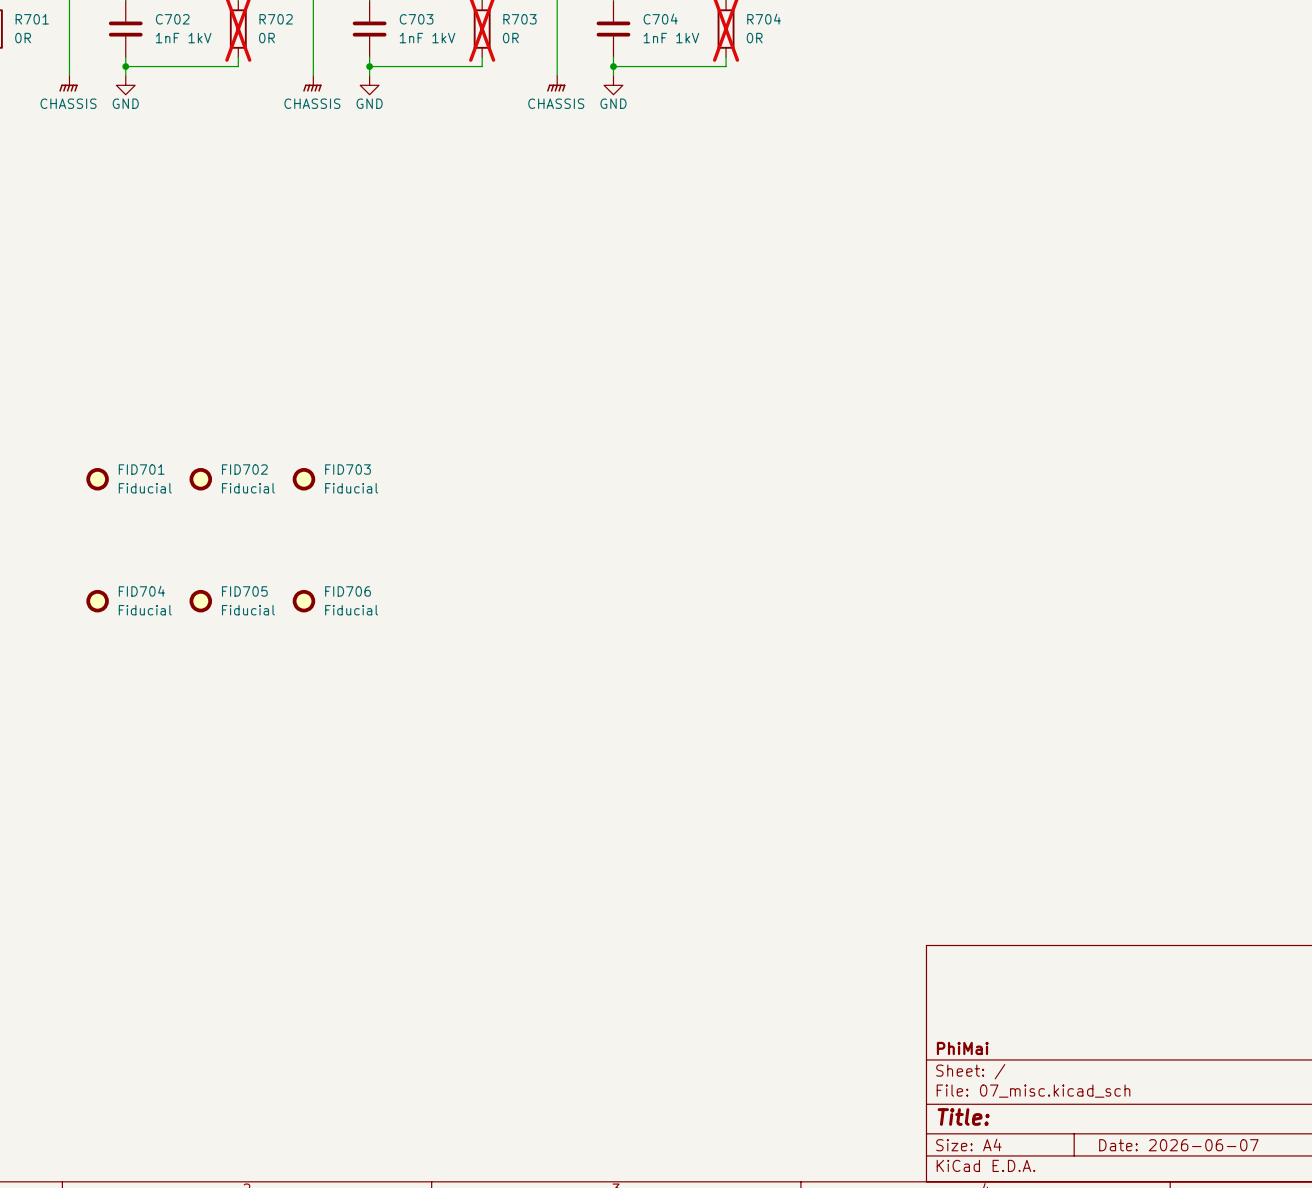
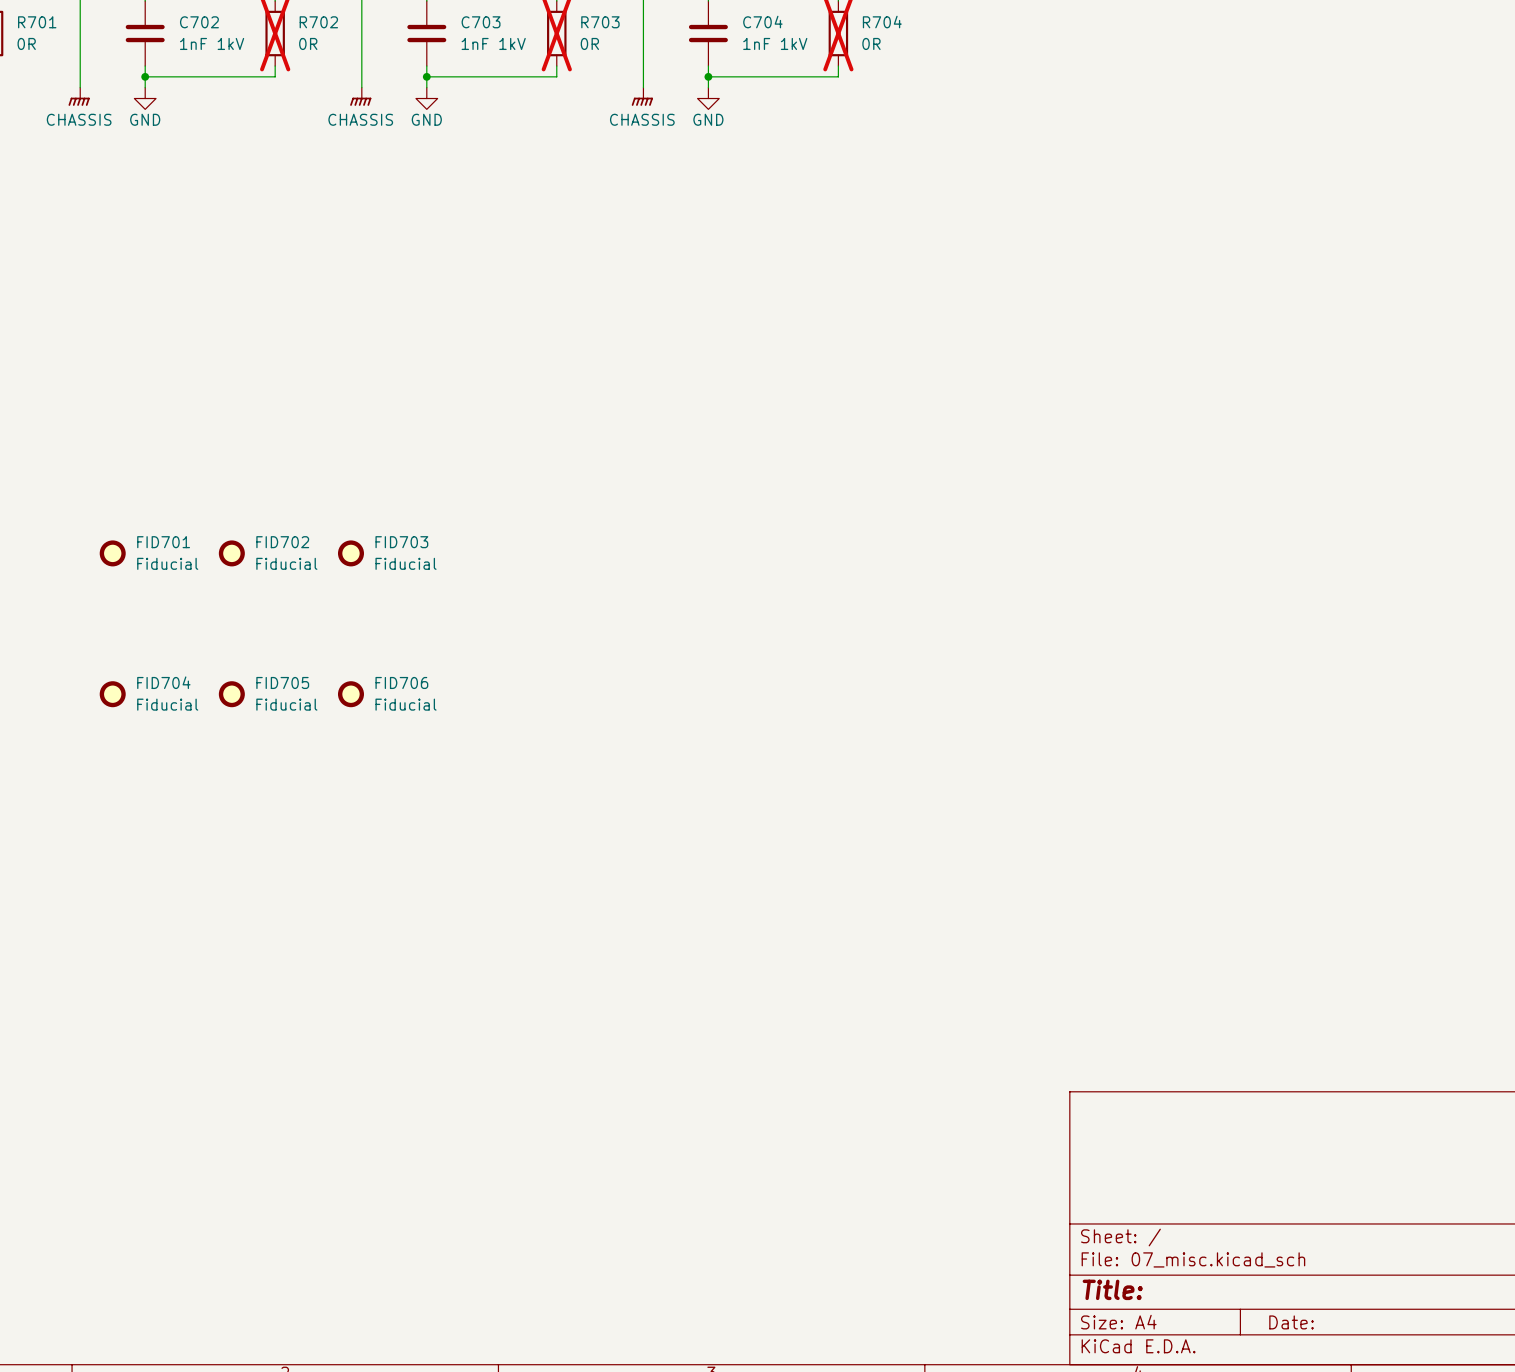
title block: PhiMai (962, 1048) -> none
title block: Date: 2026-06-07 (1178, 1145) -> Date: (1291, 1322)

